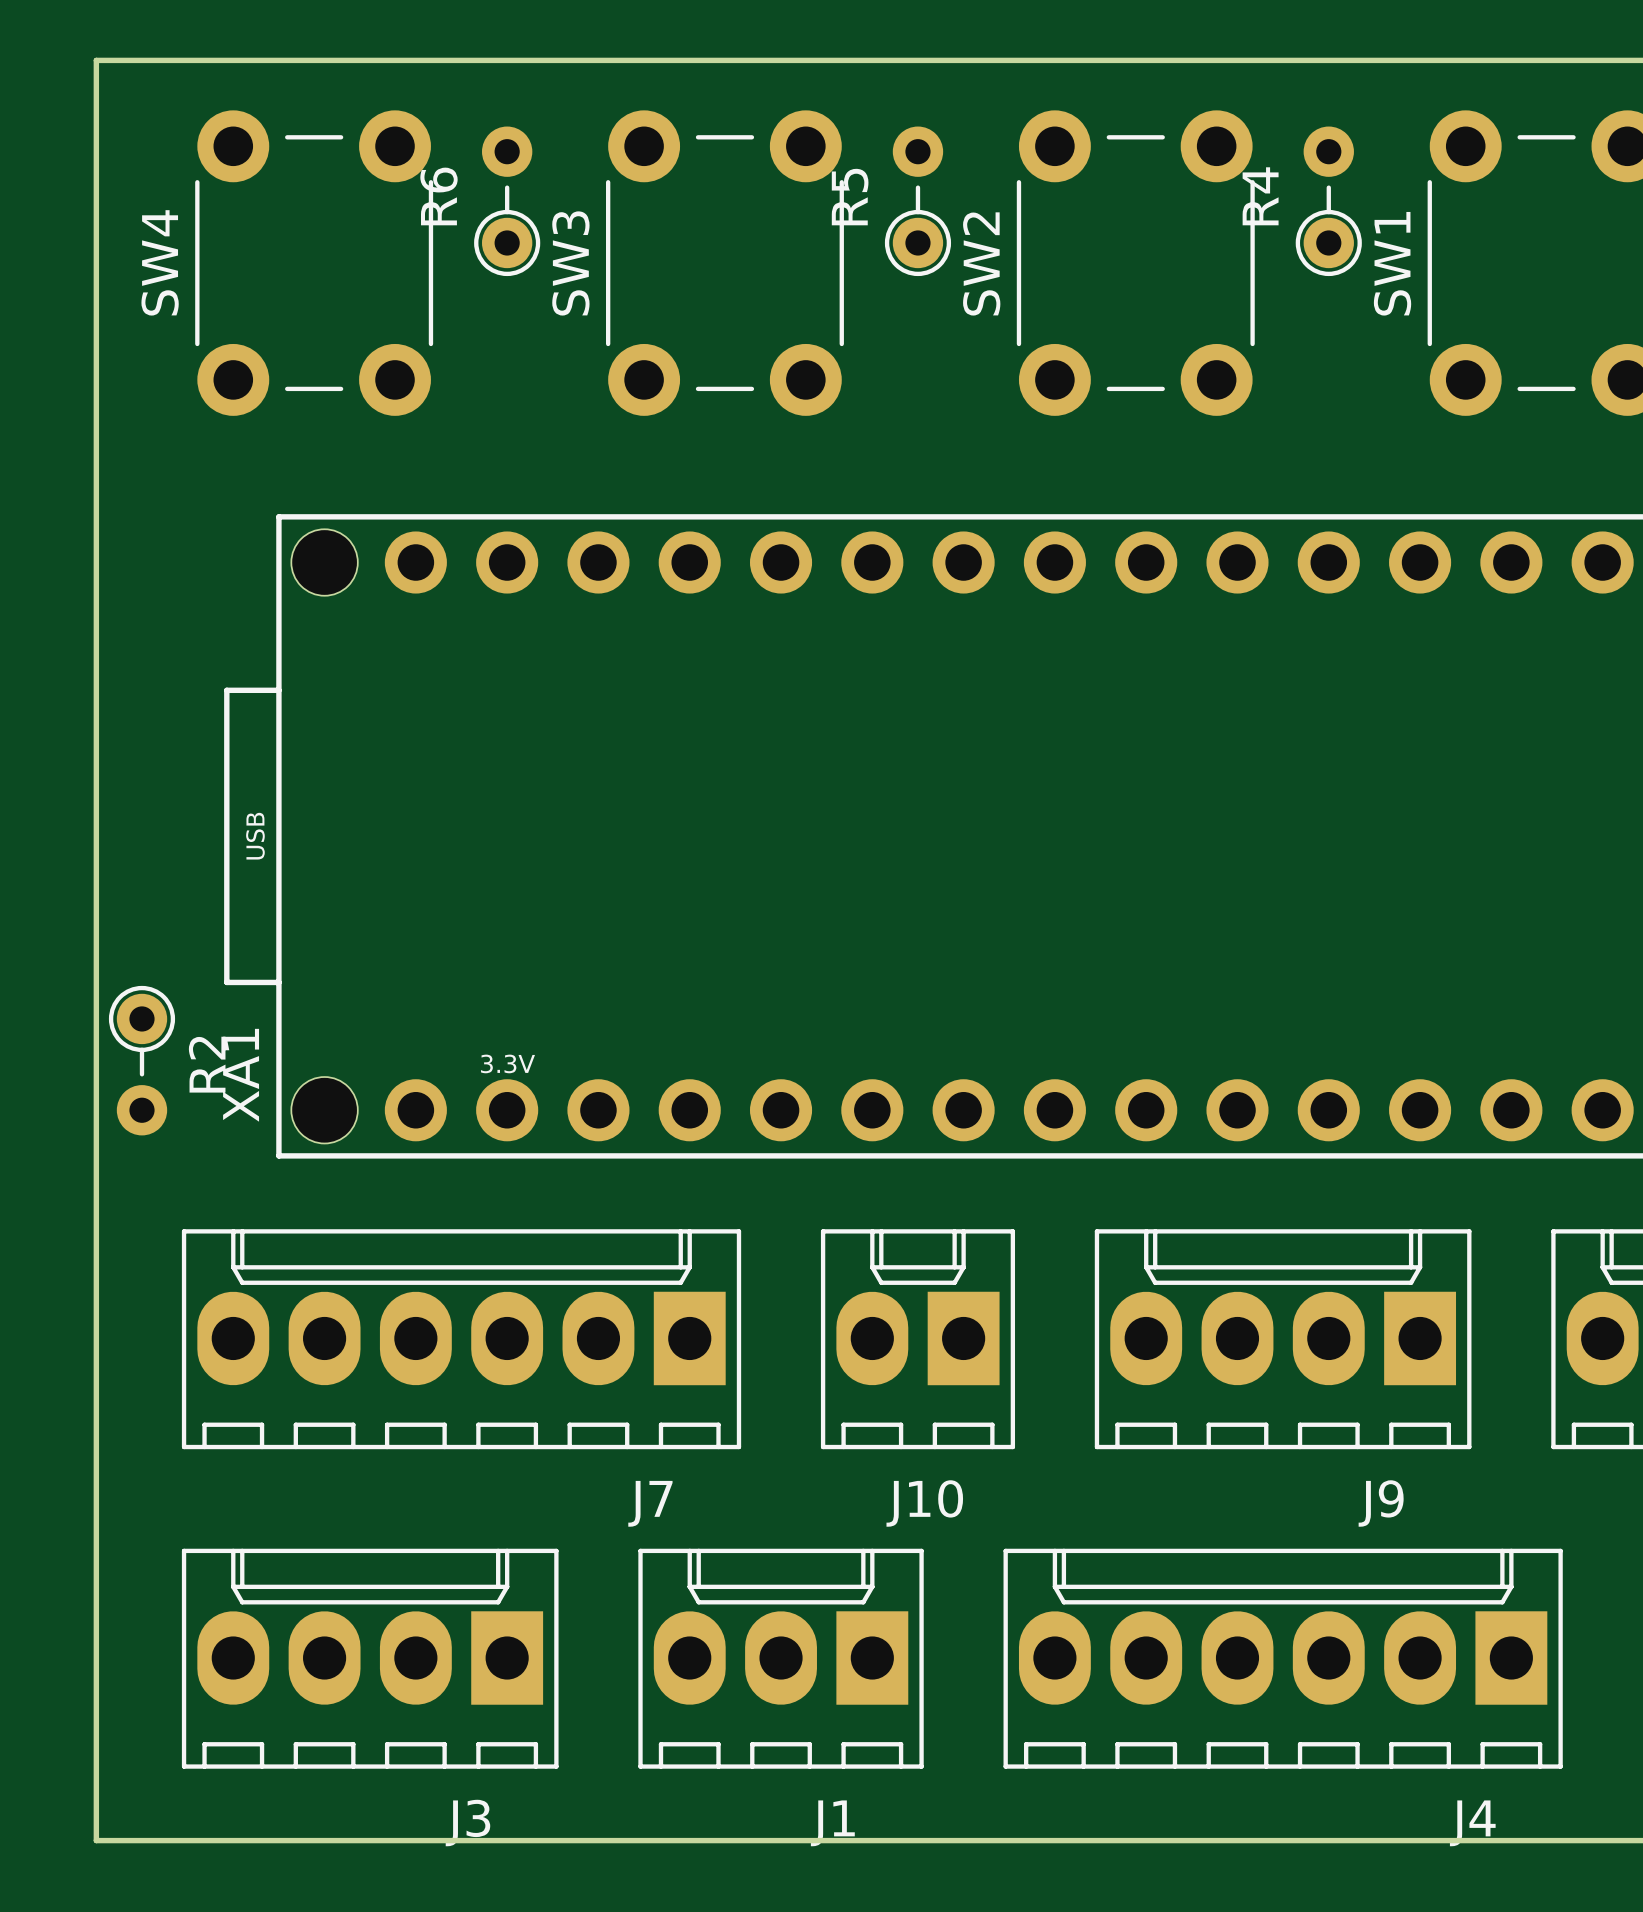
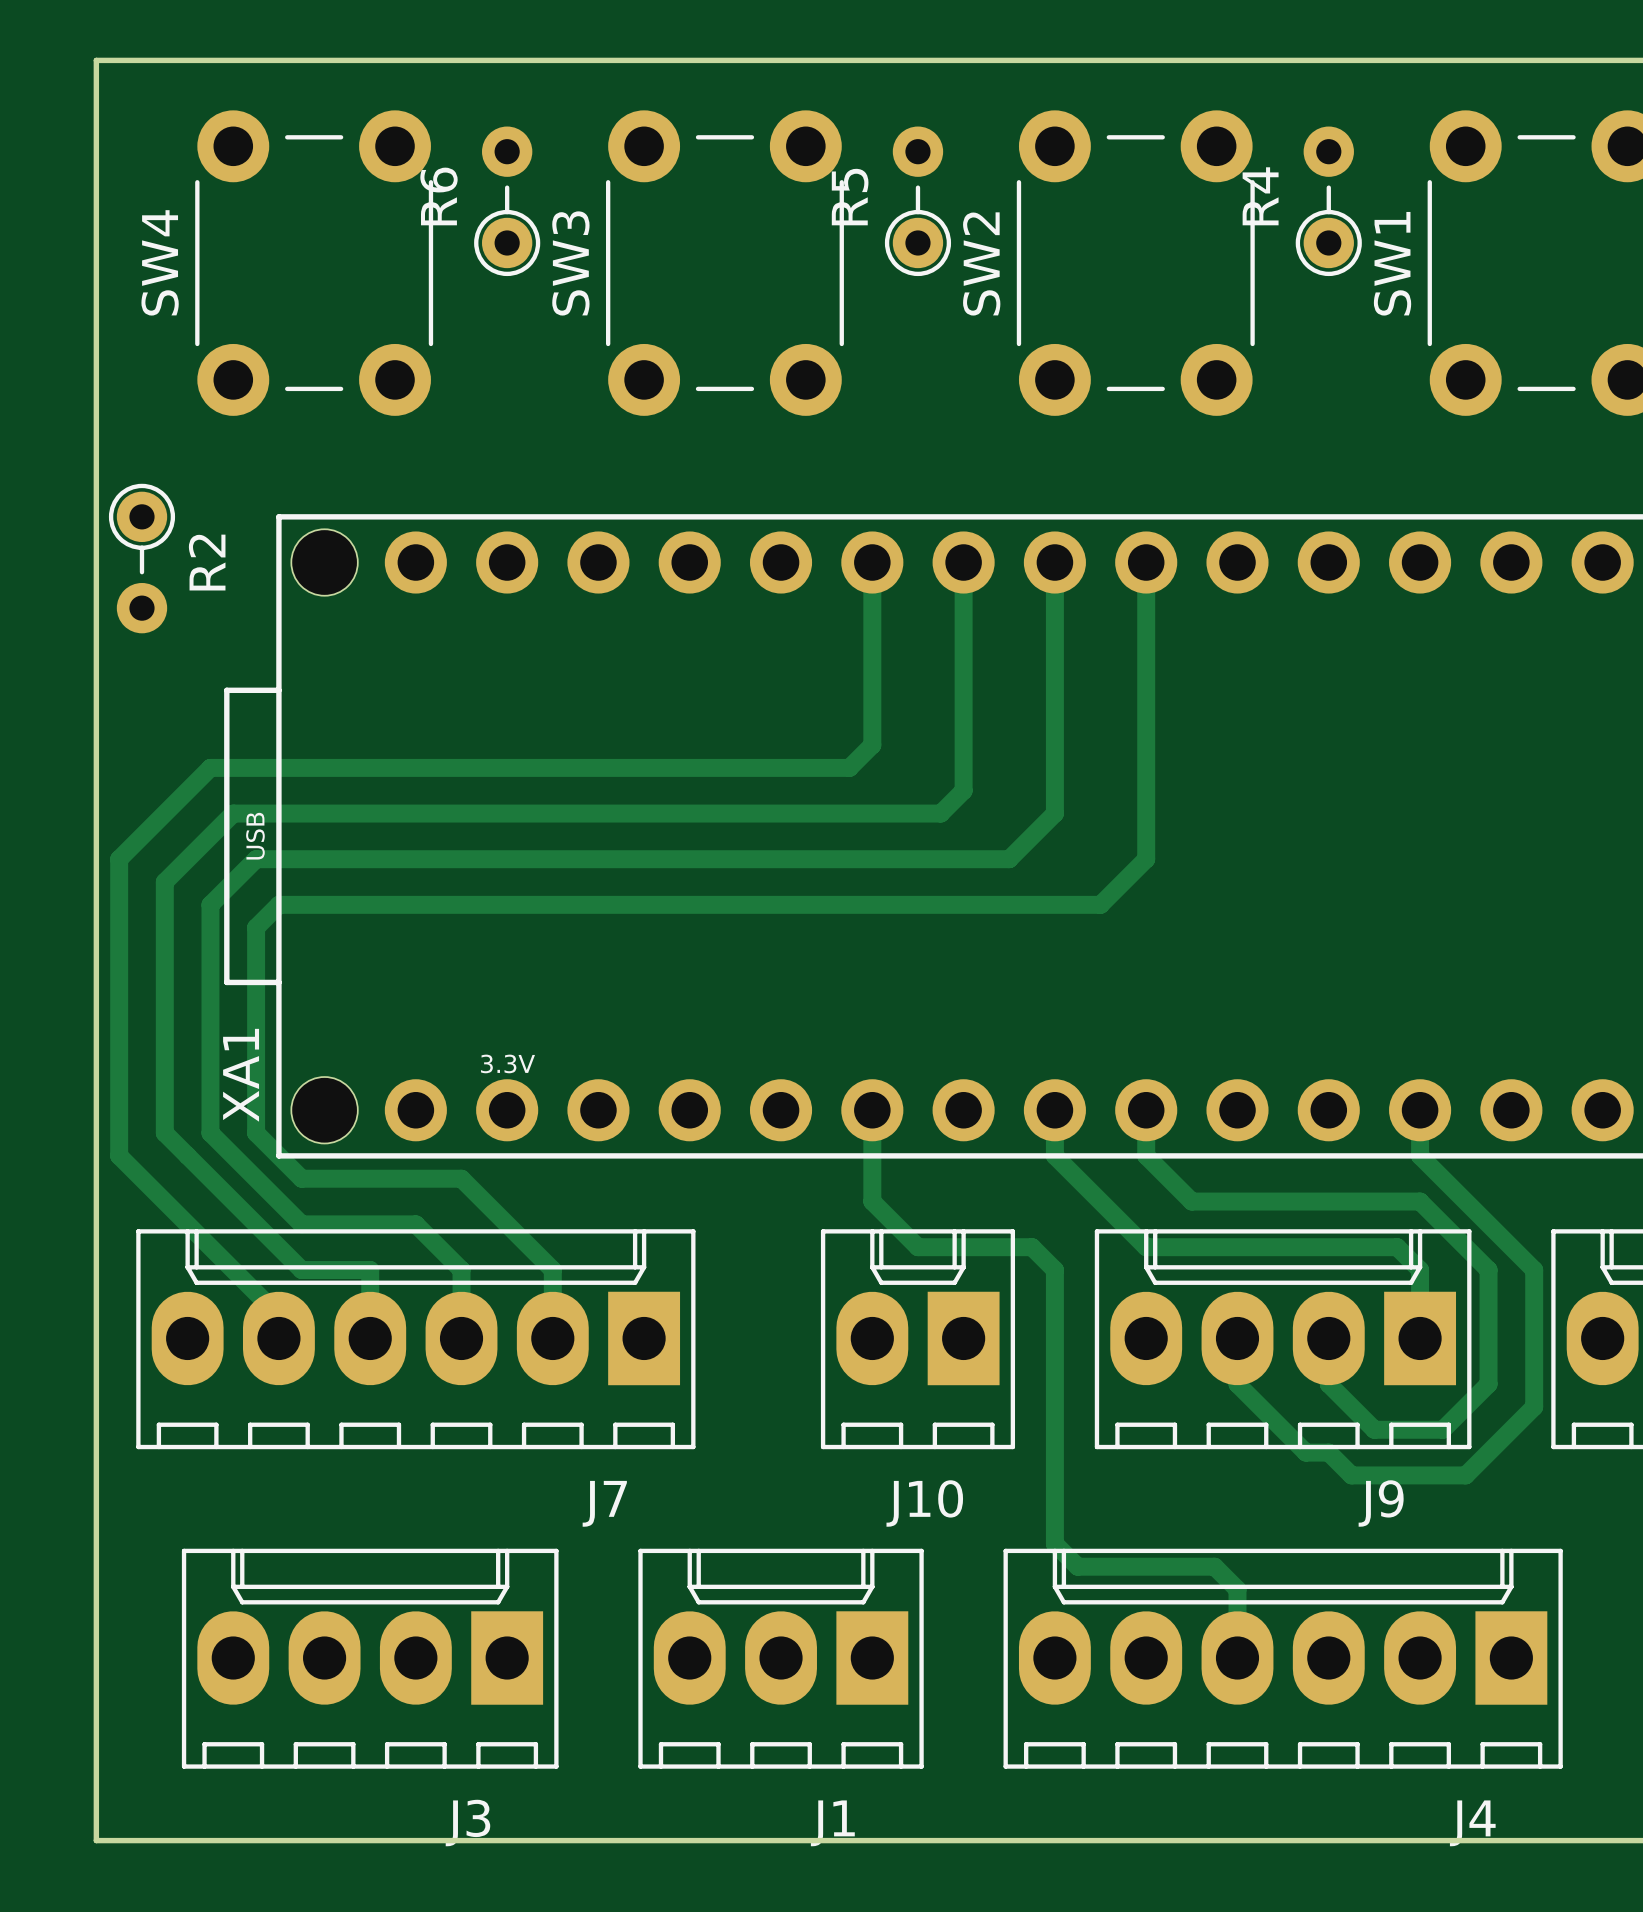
track: none -> (872, 562) (872, 745) (849, 767) (210, 767) (119, 859) (119, 1155) (278, 1315) (278, 1338)
track: none -> (963, 562) (963, 790) (940, 813) (233, 813) (164, 882) (164, 1133) (301, 1270) (370, 1270) (370, 1338)
track: none -> (1054, 562) (1054, 813) (1009, 859) (256, 859) (210, 904) (210, 1133) (301, 1224) (415, 1224) (461, 1270) (461, 1338)
track: none -> (1146, 562) (1146, 859) (1100, 904) (278, 904) (256, 927) (256, 1133) (301, 1178) (461, 1178) (552, 1270) (552, 1338)
R2 position: (141, 1060) -> (141, 558)
track: none -> (872, 1110) (872, 1201) (917, 1247) (1032, 1247) (1054, 1270) (1054, 1543) (1077, 1566) (1214, 1566) (1237, 1589) (1237, 1658)
track: none -> (1054, 1110) (1054, 1155) (1146, 1247) (1397, 1247) (1420, 1270) (1420, 1338)
track: none -> (1146, 1110) (1146, 1155) (1191, 1201) (1420, 1201) (1488, 1270) (1488, 1384) (1442, 1429) (1374, 1429) (1328, 1384) (1328, 1338)
track: none -> (1420, 1110) (1420, 1155) (1534, 1270) (1534, 1406) (1465, 1475) (1351, 1475) (1328, 1452) (1305, 1452) (1237, 1384) (1237, 1338)
J7 position: (461, 1339) -> (415, 1339)

